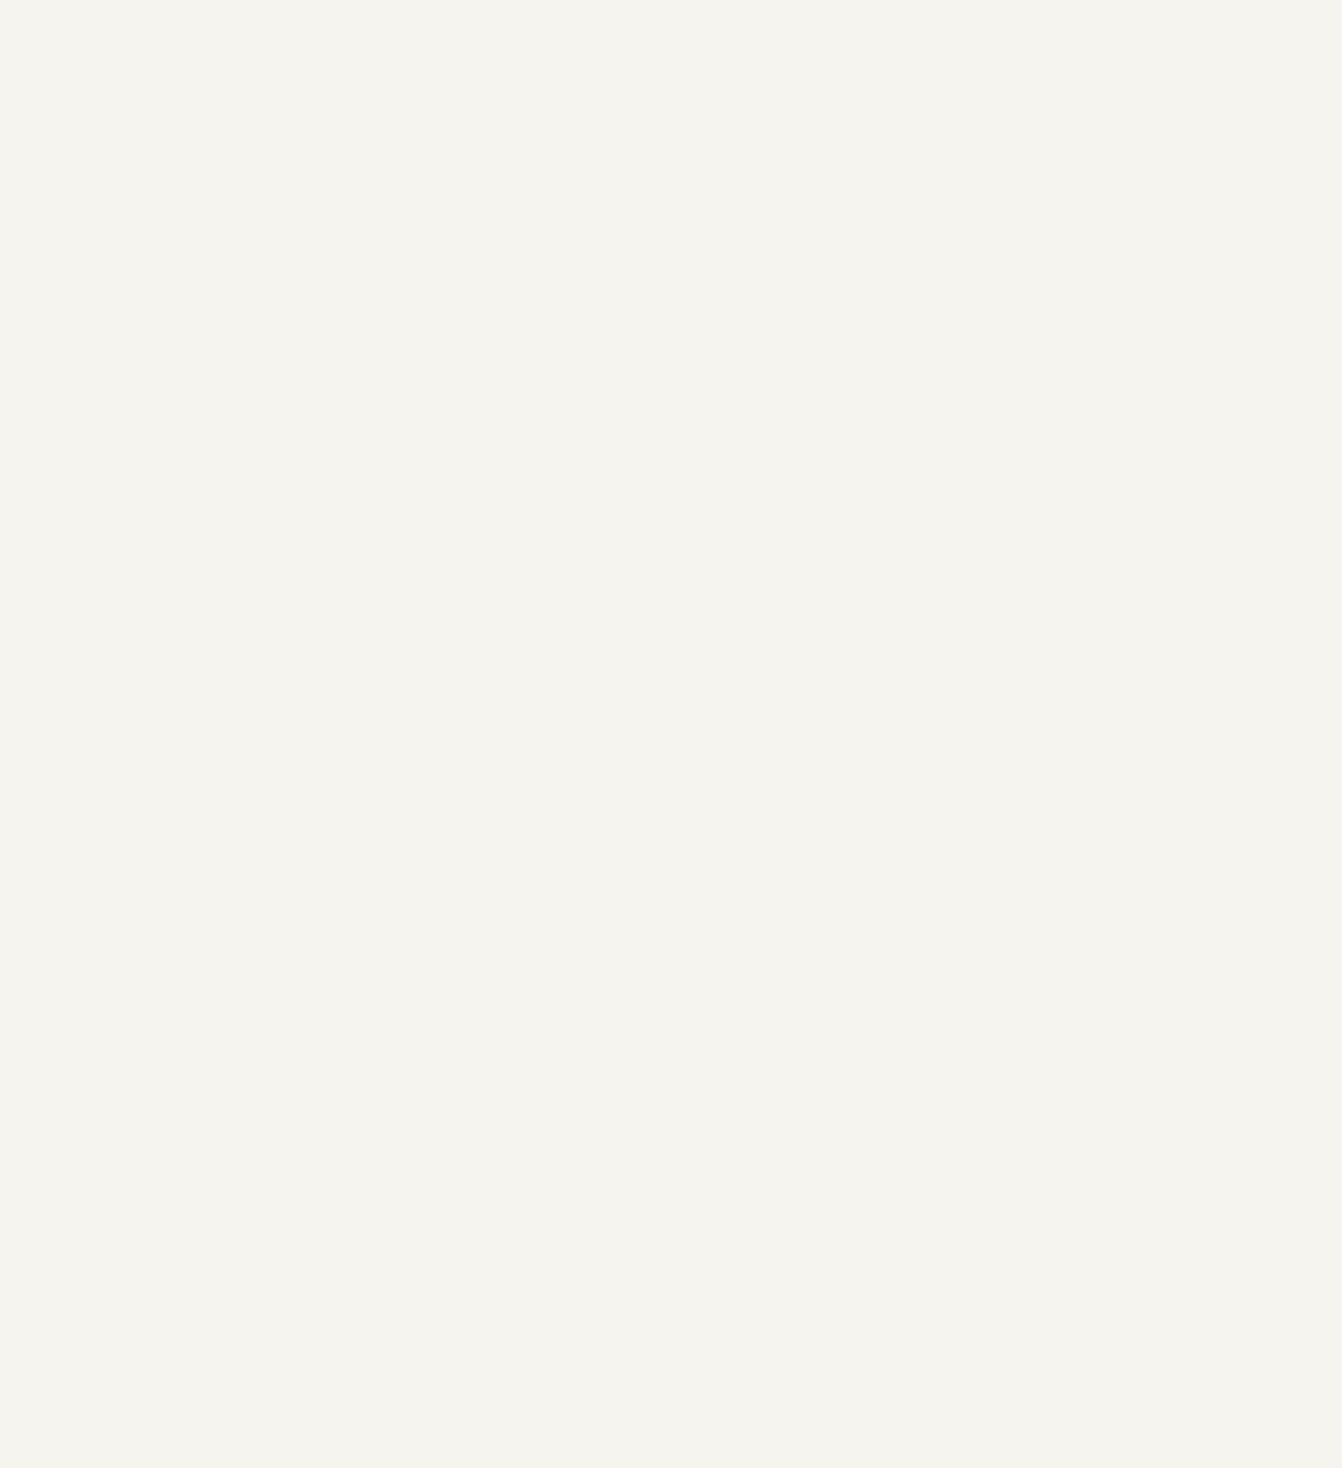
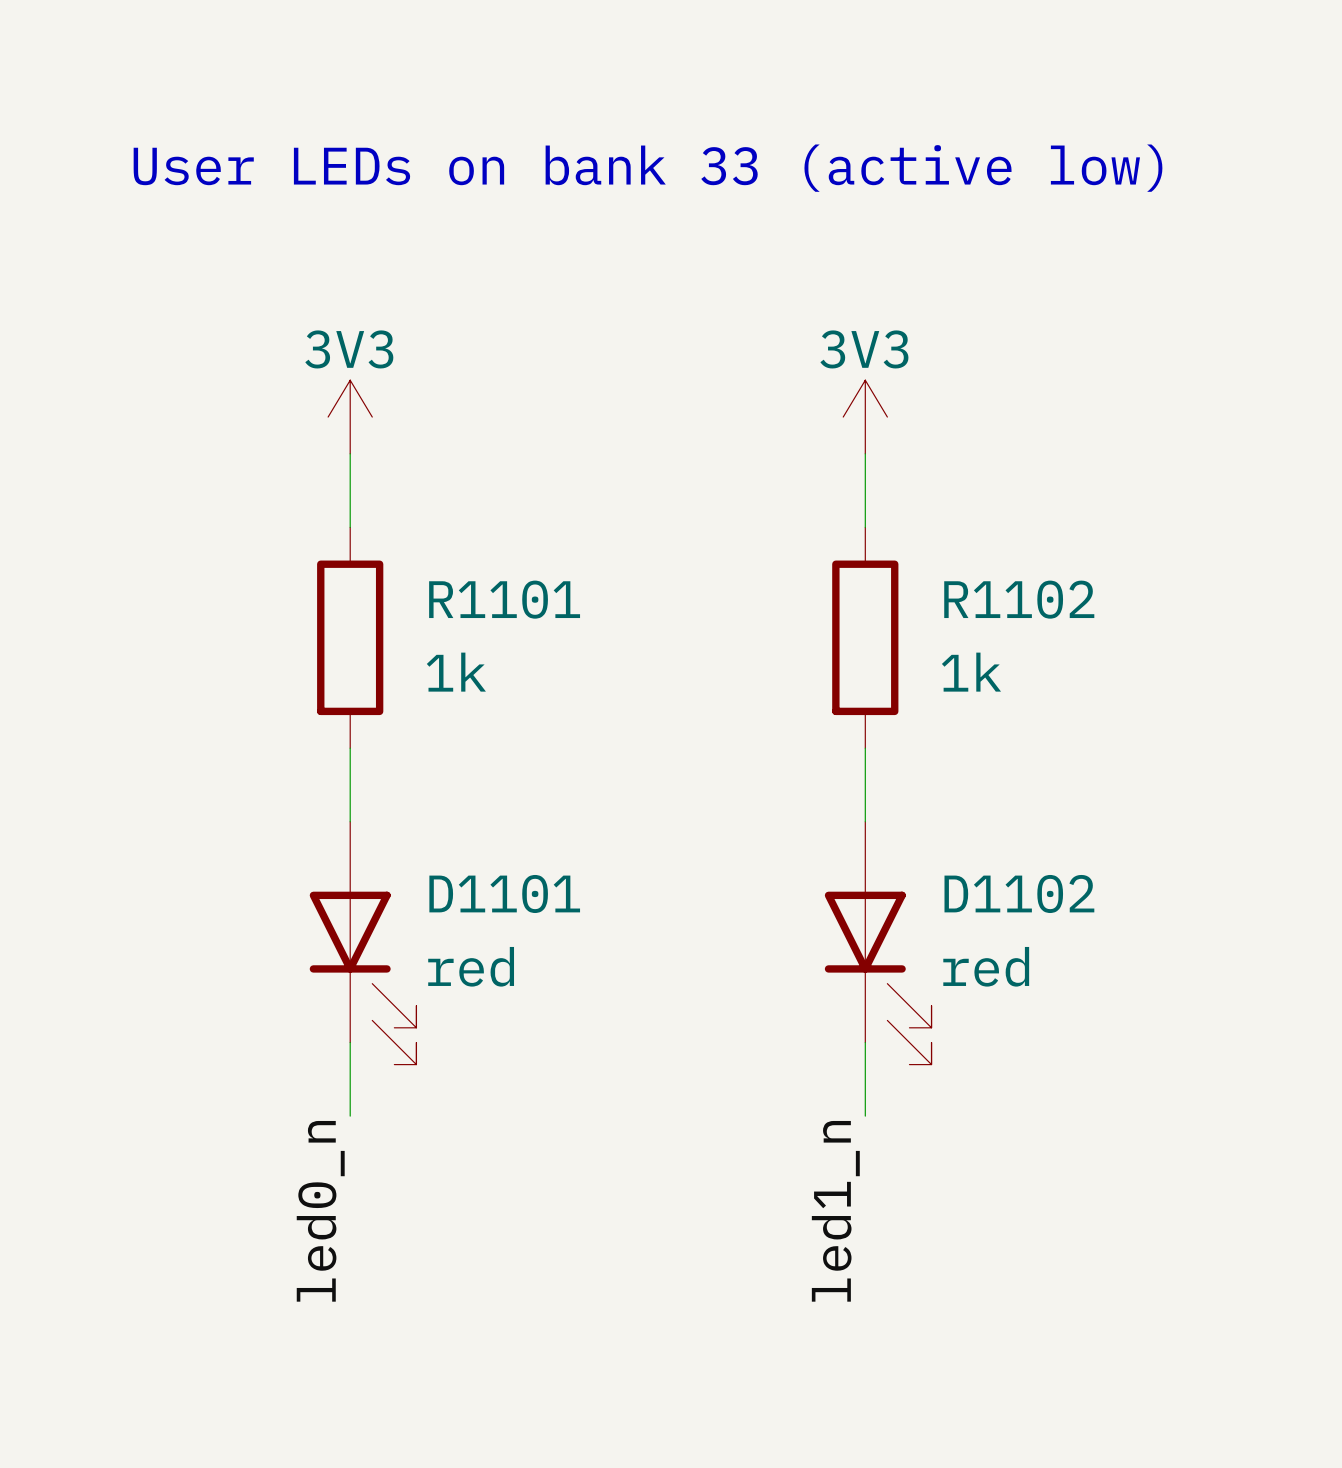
text: none -> User LEDs on bank 33 (active low) (648, 168)
power symbol: none -> 3V3 (350, 417)
power symbol: none -> 3V3 (865, 417)
wire: none -> (350, 453) (350, 527)
wire: none -> (865, 453) (865, 527)
R1101: none -> 1k (350, 637)
R1102: none -> 1k (865, 637)
wire: none -> (350, 748) (350, 821)
wire: none -> (865, 748) (865, 821)
D1101: none -> red (363, 943)
D1102: none -> red (878, 943)
wire: none -> (350, 1042) (350, 1116)
wire: none -> (865, 1042) (865, 1116)
label: none -> led0_n (320, 1211)
label: none -> led1_n (835, 1211)

